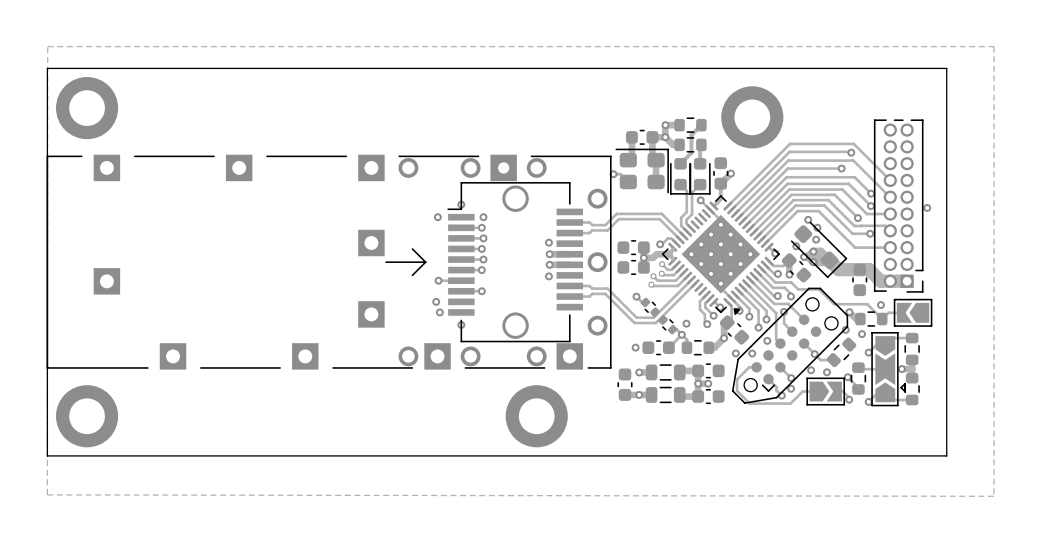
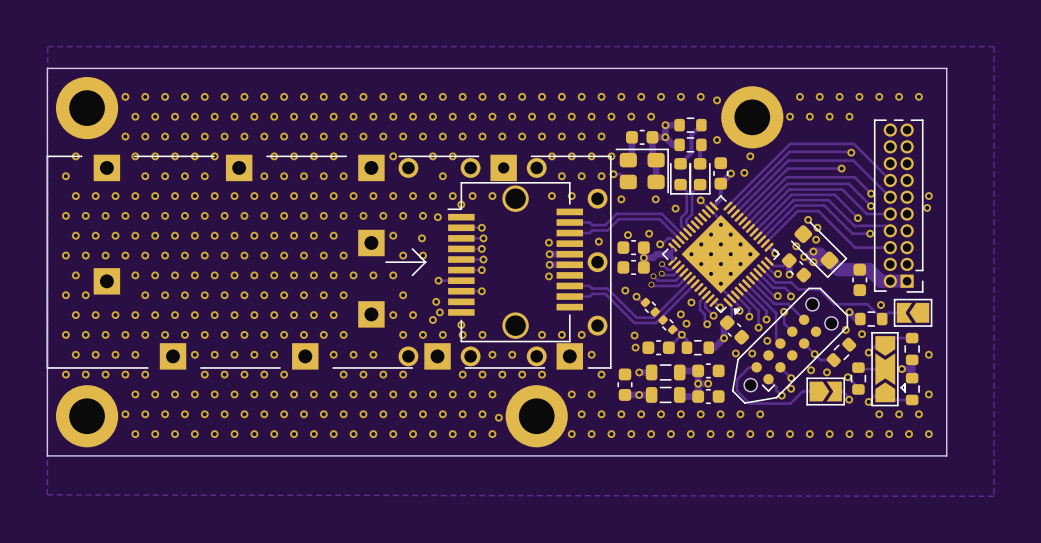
via: none -> (125, 96)
via: none -> (145, 96)
via: none -> (165, 96)
via: none -> (184, 96)
via: none -> (204, 96)
via: none -> (224, 96)
via: none -> (244, 96)
via: none -> (264, 96)
via: none -> (284, 96)
via: none -> (303, 96)
via: none -> (323, 96)
via: none -> (343, 96)
via: none -> (363, 96)
via: none -> (383, 96)
via: none -> (403, 96)
via: none -> (423, 96)
via: none -> (442, 96)
via: none -> (462, 96)
via: none -> (482, 96)
via: none -> (502, 96)
via: none -> (522, 96)
via: none -> (542, 96)
via: none -> (561, 96)
via: none -> (581, 96)
via: none -> (601, 96)
via: none -> (621, 96)
via: none -> (641, 96)
via: none -> (661, 96)
via: none -> (680, 96)
via: none -> (700, 96)
via: none -> (799, 96)
via: none -> (819, 96)
via: none -> (839, 96)
via: none -> (859, 96)
via: none -> (879, 96)
via: none -> (899, 96)
via: none -> (918, 96)
via: none -> (717, 100)
via: none -> (135, 116)
via: none -> (155, 116)
via: none -> (175, 116)
via: none -> (194, 116)
via: none -> (214, 116)
via: none -> (234, 116)
via: none -> (254, 116)
via: none -> (274, 116)
via: none -> (294, 116)
via: none -> (313, 116)
via: none -> (333, 116)
via: none -> (353, 116)
via: none -> (373, 116)
via: none -> (393, 116)
via: none -> (413, 116)
via: none -> (432, 116)
via: none -> (452, 116)
via: none -> (472, 116)
via: none -> (492, 116)
via: none -> (512, 116)
via: none -> (532, 116)
via: none -> (551, 116)
via: none -> (571, 116)
via: none -> (591, 116)
via: none -> (611, 116)
via: none -> (631, 116)
via: none -> (651, 116)
via: none -> (790, 116)
via: none -> (809, 116)
via: none -> (829, 116)
via: none -> (849, 116)
via: none -> (125, 136)
via: none -> (145, 136)
via: none -> (165, 136)
via: none -> (184, 136)
via: none -> (204, 136)
via: none -> (224, 136)
via: none -> (244, 136)
via: none -> (264, 136)
via: none -> (284, 136)
via: none -> (303, 136)
via: none -> (323, 136)
via: none -> (343, 136)
via: none -> (363, 136)
via: none -> (383, 136)
via: none -> (403, 136)
via: none -> (423, 136)
via: none -> (442, 136)
via: none -> (462, 136)
via: none -> (482, 136)
via: none -> (502, 136)
via: none -> (522, 136)
via: none -> (542, 136)
via: none -> (561, 136)
via: none -> (581, 136)
via: none -> (601, 136)
via: none -> (717, 140)
via: none -> (75, 156)
via: none -> (135, 156)
via: none -> (155, 156)
via: none -> (175, 156)
via: none -> (194, 156)
via: none -> (214, 156)
via: none -> (274, 156)
via: none -> (294, 156)
via: none -> (313, 156)
via: none -> (333, 156)
via: none -> (393, 156)
via: none -> (432, 156)
via: none -> (452, 156)
via: none -> (551, 156)
via: none -> (571, 156)
via: none -> (591, 156)
via: none -> (611, 156)
via: none -> (750, 156)
via: none -> (744, 172)
via: none -> (65, 176)
via: none -> (145, 176)
via: none -> (165, 176)
via: none -> (184, 176)
via: none -> (204, 176)
via: none -> (264, 176)
via: none -> (284, 176)
via: none -> (303, 176)
via: none -> (323, 176)
via: none -> (343, 176)
via: none -> (442, 176)
via: none -> (561, 176)
via: none -> (581, 176)
via: none -> (601, 176)
via: none -> (75, 196)
via: none -> (95, 196)
via: none -> (115, 196)
via: none -> (135, 196)
via: none -> (155, 196)
via: none -> (175, 196)
via: none -> (194, 196)
via: none -> (214, 196)
via: none -> (234, 196)
via: none -> (254, 196)
via: none -> (274, 196)
via: none -> (294, 196)
via: none -> (313, 196)
via: none -> (333, 196)
via: none -> (353, 196)
via: none -> (373, 196)
via: none -> (393, 196)
via: none -> (413, 196)
via: none -> (432, 196)
via: none -> (452, 196)
via: none -> (472, 196)
via: none -> (492, 196)
via: none -> (551, 196)
via: none -> (571, 196)
via: none -> (928, 196)
via: none -> (621, 199)
via: none -> (655, 199)
via: none -> (675, 208)
via: none -> (65, 215)
via: none -> (85, 215)
via: none -> (105, 215)
via: none -> (125, 215)
via: none -> (145, 215)
via: none -> (165, 215)
via: none -> (184, 215)
via: none -> (204, 215)
via: none -> (224, 215)
via: none -> (244, 215)
via: none -> (264, 215)
via: none -> (284, 215)
via: none -> (303, 215)
via: none -> (323, 215)
via: none -> (343, 215)
via: none -> (363, 215)
via: none -> (383, 215)
via: none -> (403, 215)
via: none -> (423, 215)
via: (483, 217) -> none
via: none -> (649, 233)
via: none -> (75, 235)
via: none -> (95, 235)
via: none -> (115, 235)
via: none -> (135, 235)
via: none -> (155, 235)
via: none -> (175, 235)
via: none -> (194, 235)
via: none -> (214, 235)
via: none -> (234, 235)
via: none -> (254, 235)
via: none -> (274, 235)
via: none -> (294, 235)
via: none -> (313, 235)
via: none -> (333, 235)
via: none -> (393, 235)
via: none -> (627, 235)
via: none -> (421, 238)
via: none -> (598, 241)
via: none -> (65, 255)
via: none -> (85, 255)
via: none -> (105, 255)
via: none -> (125, 255)
via: none -> (145, 255)
via: none -> (165, 255)
via: none -> (184, 255)
via: none -> (204, 255)
via: none -> (224, 255)
via: none -> (244, 255)
via: none -> (264, 255)
via: none -> (284, 255)
via: none -> (303, 255)
via: none -> (323, 255)
via: none -> (343, 255)
via: none -> (403, 255)
via: none -> (423, 255)
via: none -> (75, 275)
via: none -> (135, 275)
via: none -> (155, 275)
via: none -> (175, 275)
via: none -> (194, 275)
via: none -> (214, 275)
via: none -> (234, 275)
via: none -> (254, 275)
via: none -> (274, 275)
via: none -> (294, 275)
via: none -> (313, 275)
via: none -> (333, 275)
via: none -> (353, 275)
via: none -> (373, 275)
via: none -> (393, 275)
via: none -> (625, 290)
via: none -> (65, 295)
via: none -> (85, 295)
via: none -> (145, 295)
via: none -> (165, 295)
via: none -> (184, 295)
via: none -> (204, 295)
via: none -> (224, 295)
via: none -> (244, 295)
via: none -> (264, 295)
via: none -> (284, 295)
via: none -> (303, 295)
via: none -> (323, 295)
via: none -> (343, 295)
via: none -> (403, 295)
via: none -> (691, 302)
via: none -> (680, 314)
via: none -> (75, 315)
via: none -> (95, 315)
via: none -> (115, 315)
via: none -> (135, 315)
via: none -> (155, 315)
via: none -> (175, 315)
via: none -> (194, 315)
via: none -> (214, 315)
via: none -> (234, 315)
via: none -> (254, 315)
via: none -> (274, 315)
via: none -> (294, 315)
via: none -> (313, 315)
via: none -> (333, 315)
via: none -> (393, 315)
via: none -> (413, 315)
via: none -> (432, 320)
via: none -> (65, 334)
via: none -> (85, 334)
via: none -> (105, 334)
via: none -> (125, 334)
via: none -> (145, 334)
via: none -> (165, 334)
via: none -> (184, 334)
via: none -> (204, 334)
via: none -> (224, 334)
via: none -> (244, 334)
via: none -> (264, 334)
via: none -> (284, 334)
via: none -> (303, 334)
via: none -> (323, 334)
via: none -> (343, 334)
via: none -> (403, 334)
via: none -> (423, 334)
via: none -> (442, 334)
via: none -> (462, 334)
via: none -> (482, 334)
via: none -> (542, 334)
via: none -> (561, 334)
via: none -> (581, 334)
via: none -> (634, 335)
via: none -> (75, 354)
via: none -> (95, 354)
via: none -> (115, 354)
via: none -> (135, 354)
via: none -> (194, 354)
via: none -> (214, 354)
via: none -> (234, 354)
via: none -> (254, 354)
via: none -> (274, 354)
via: none -> (333, 354)
via: none -> (353, 354)
via: none -> (373, 354)
via: none -> (492, 354)
via: none -> (512, 354)
via: none -> (591, 354)
via: none -> (928, 354)
via: none -> (65, 374)
via: none -> (85, 374)
via: none -> (105, 374)
via: none -> (125, 374)
via: none -> (145, 374)
via: none -> (204, 374)
via: none -> (224, 374)
via: none -> (244, 374)
via: none -> (264, 374)
via: none -> (284, 374)
via: none -> (343, 374)
via: none -> (363, 374)
via: none -> (383, 374)
via: none -> (403, 374)
via: none -> (462, 374)
via: none -> (482, 374)
via: none -> (502, 374)
via: none -> (522, 374)
via: none -> (542, 374)
via: none -> (601, 374)
via: none -> (135, 394)
via: none -> (155, 394)
via: none -> (175, 394)
via: none -> (194, 394)
via: none -> (214, 394)
via: none -> (234, 394)
via: none -> (254, 394)
via: none -> (274, 394)
via: none -> (294, 394)
via: none -> (313, 394)
via: none -> (333, 394)
via: none -> (353, 394)
via: none -> (373, 394)
via: none -> (393, 394)
via: none -> (413, 394)
via: none -> (432, 394)
via: none -> (452, 394)
via: none -> (472, 394)
via: none -> (492, 394)
via: none -> (571, 394)
via: none -> (591, 394)
via: none -> (928, 394)
via: none -> (125, 414)
via: none -> (145, 414)
via: none -> (165, 414)
via: none -> (184, 414)
via: none -> (204, 414)
via: none -> (224, 414)
via: none -> (244, 414)
via: none -> (264, 414)
via: none -> (284, 414)
via: none -> (303, 414)
via: none -> (323, 414)
via: none -> (343, 414)
via: none -> (363, 414)
via: none -> (383, 414)
via: none -> (403, 414)
via: none -> (423, 414)
via: none -> (442, 414)
via: none -> (462, 414)
via: none -> (482, 414)
via: none -> (581, 414)
via: none -> (601, 414)
via: none -> (621, 414)
via: none -> (641, 414)
via: none -> (661, 414)
via: none -> (680, 414)
via: none -> (700, 414)
via: none -> (720, 414)
via: none -> (740, 414)
via: none -> (760, 414)
via: none -> (879, 414)
via: none -> (899, 414)
via: none -> (918, 414)
via: none -> (498, 417)
via: none -> (135, 434)
via: none -> (155, 434)
via: none -> (175, 434)
via: none -> (194, 434)
via: none -> (214, 434)
via: none -> (234, 434)
via: none -> (254, 434)
via: none -> (274, 434)
via: none -> (294, 434)
via: none -> (313, 434)
via: none -> (333, 434)
via: none -> (353, 434)
via: none -> (373, 434)
via: none -> (393, 434)
via: none -> (413, 434)
via: none -> (432, 434)
via: none -> (452, 434)
via: none -> (472, 434)
via: none -> (492, 434)
via: none -> (571, 434)
via: none -> (591, 434)
via: none -> (611, 434)
via: none -> (631, 434)
via: none -> (651, 434)
via: none -> (670, 434)
via: none -> (690, 434)
via: none -> (710, 434)
via: none -> (730, 434)
via: none -> (750, 434)
via: none -> (770, 434)
via: none -> (790, 434)
via: none -> (809, 434)
via: none -> (829, 434)
via: none -> (849, 434)
via: none -> (869, 434)
via: none -> (889, 434)
via: none -> (909, 434)
via: none -> (928, 434)

